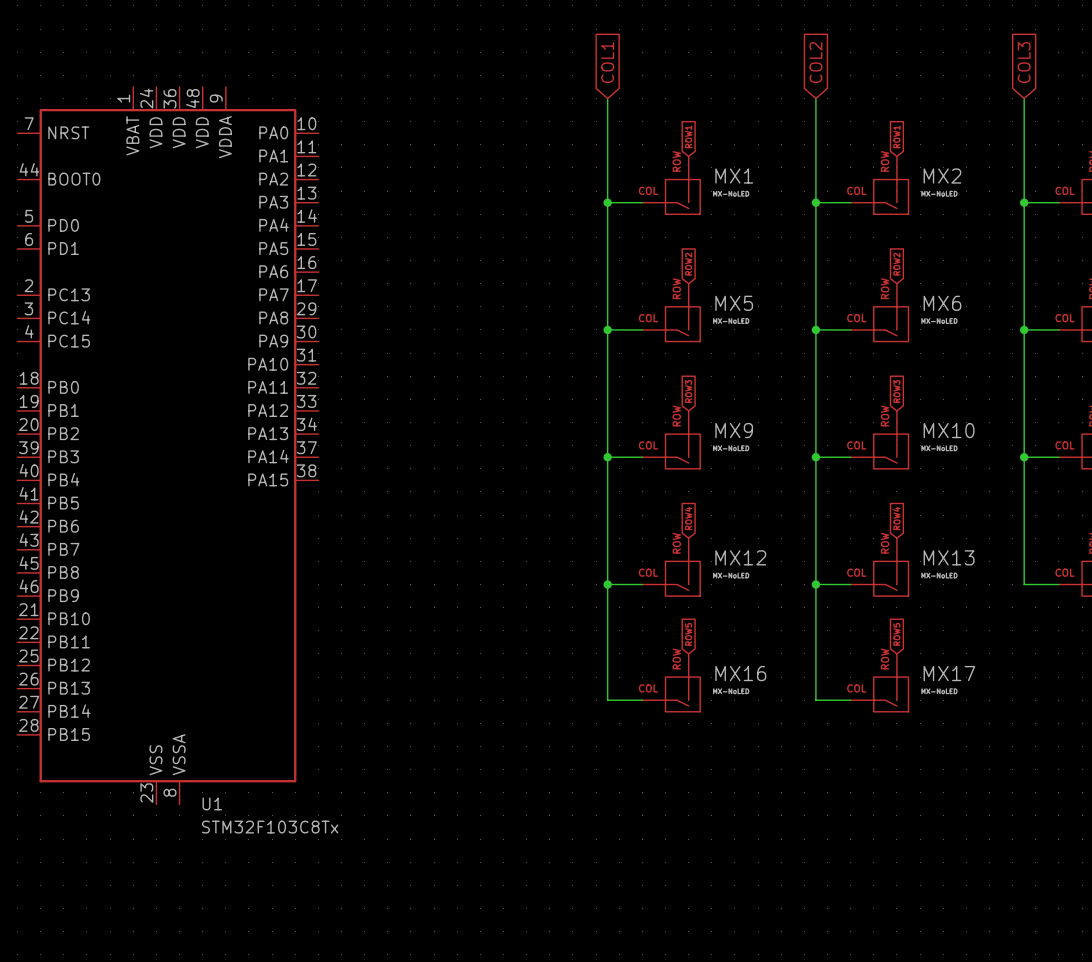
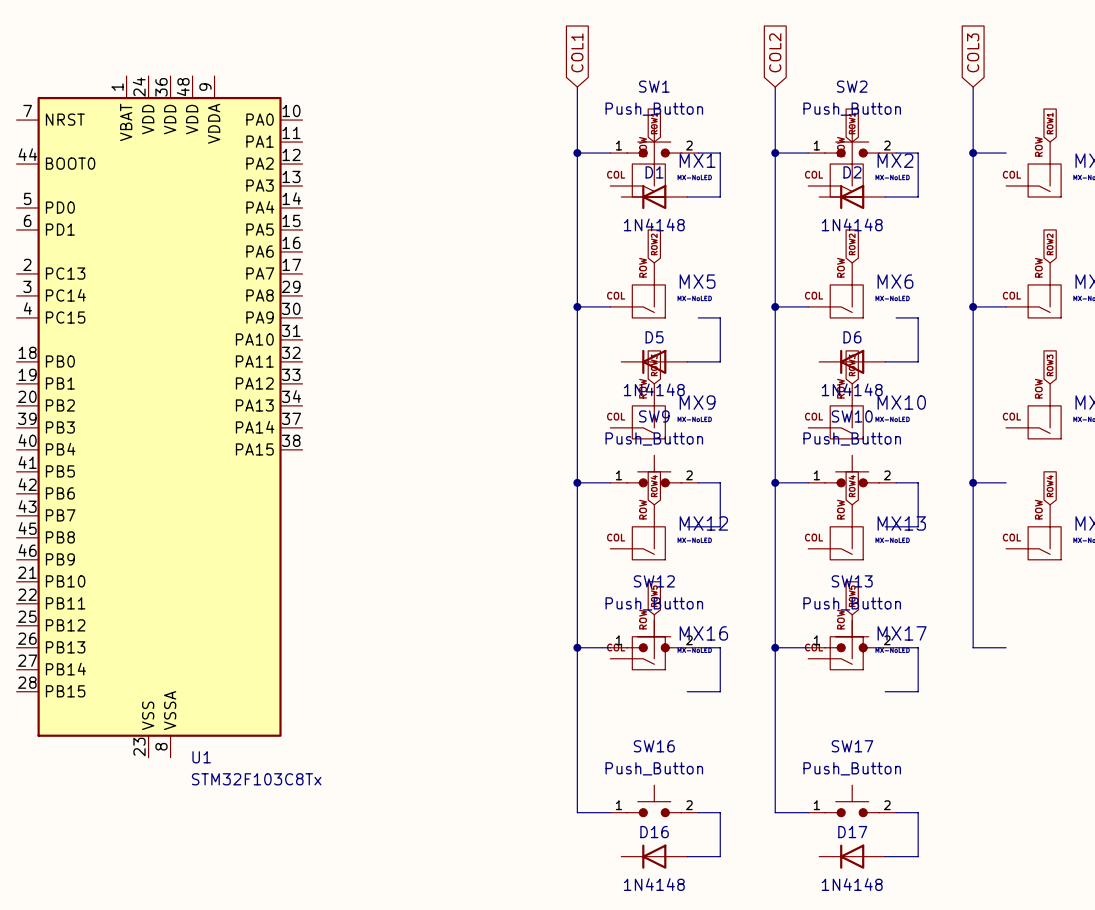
SW1: none -> Push_Button (654, 141)
SW2: none -> Push_Button (852, 141)
wire: none -> (698, 153) (720, 153) (720, 197) (687, 197)
wire: none -> (896, 153) (918, 153) (918, 197) (885, 197)
wire: (607, 202) (642, 202) -> (577, 153) (610, 153)
junction position: (607, 202) -> (577, 153)
wire: (815, 202) (850, 202) -> (775, 153) (808, 153)
junction position: (815, 202) -> (775, 153)
wire: (1024, 202) (1058, 202) -> (973, 153) (1006, 153)
junction position: (1024, 202) -> (973, 153)
D1: none -> 1N4148 (654, 197)
D2: none -> 1N4148 (852, 197)
wire: none -> (698, 317) (720, 317) (720, 361) (687, 361)
wire: none -> (896, 317) (918, 317) (918, 361) (885, 361)
D5: none -> 1N4148 (654, 361)
D6: none -> 1N4148 (852, 361)
wire: (607, 457) (642, 457) -> (577, 482) (610, 482)
junction: (607, 457) -> none
wire: (815, 457) (850, 457) -> (775, 482) (808, 482)
junction: (815, 457) -> none
wire: (1024, 457) (1058, 457) -> (973, 482) (1006, 482)
junction: (1024, 457) -> none
SW9: none -> Push_Button (654, 471)
SW10: none -> Push_Button (852, 471)
junction: none -> (577, 482)
wire: none -> (698, 482) (720, 482) (720, 526) (687, 526)
junction: none -> (775, 482)
wire: none -> (896, 482) (918, 482) (918, 526) (885, 526)
junction: none -> (973, 482)
wire: (607, 584) (642, 584) -> (577, 647) (610, 647)
junction: (607, 584) -> none
wire: (815, 584) (850, 584) -> (775, 647) (808, 647)
junction: (815, 584) -> none
wire: (1024, 584) (1058, 584) -> (973, 548) (973, 647) (1006, 647)
SW12: none -> Push_Button (654, 636)
SW13: none -> Push_Button (852, 636)
junction: none -> (577, 647)
wire: none -> (698, 647) (720, 647) (720, 691) (687, 691)
junction: none -> (775, 647)
wire: none -> (896, 647) (918, 647) (918, 691) (885, 691)
wire: (607, 700) (642, 700) -> (577, 658) (577, 812) (610, 812)
wire: (815, 700) (850, 700) -> (775, 658) (775, 812) (808, 812)
SW16: none -> Push_Button (654, 800)
SW17: none -> Push_Button (852, 800)
wire: none -> (698, 812) (720, 812) (720, 856) (687, 856)
wire: none -> (896, 812) (918, 812) (918, 856) (885, 856)
D16: none -> 1N4148 (654, 856)
D17: none -> 1N4148 (852, 856)

